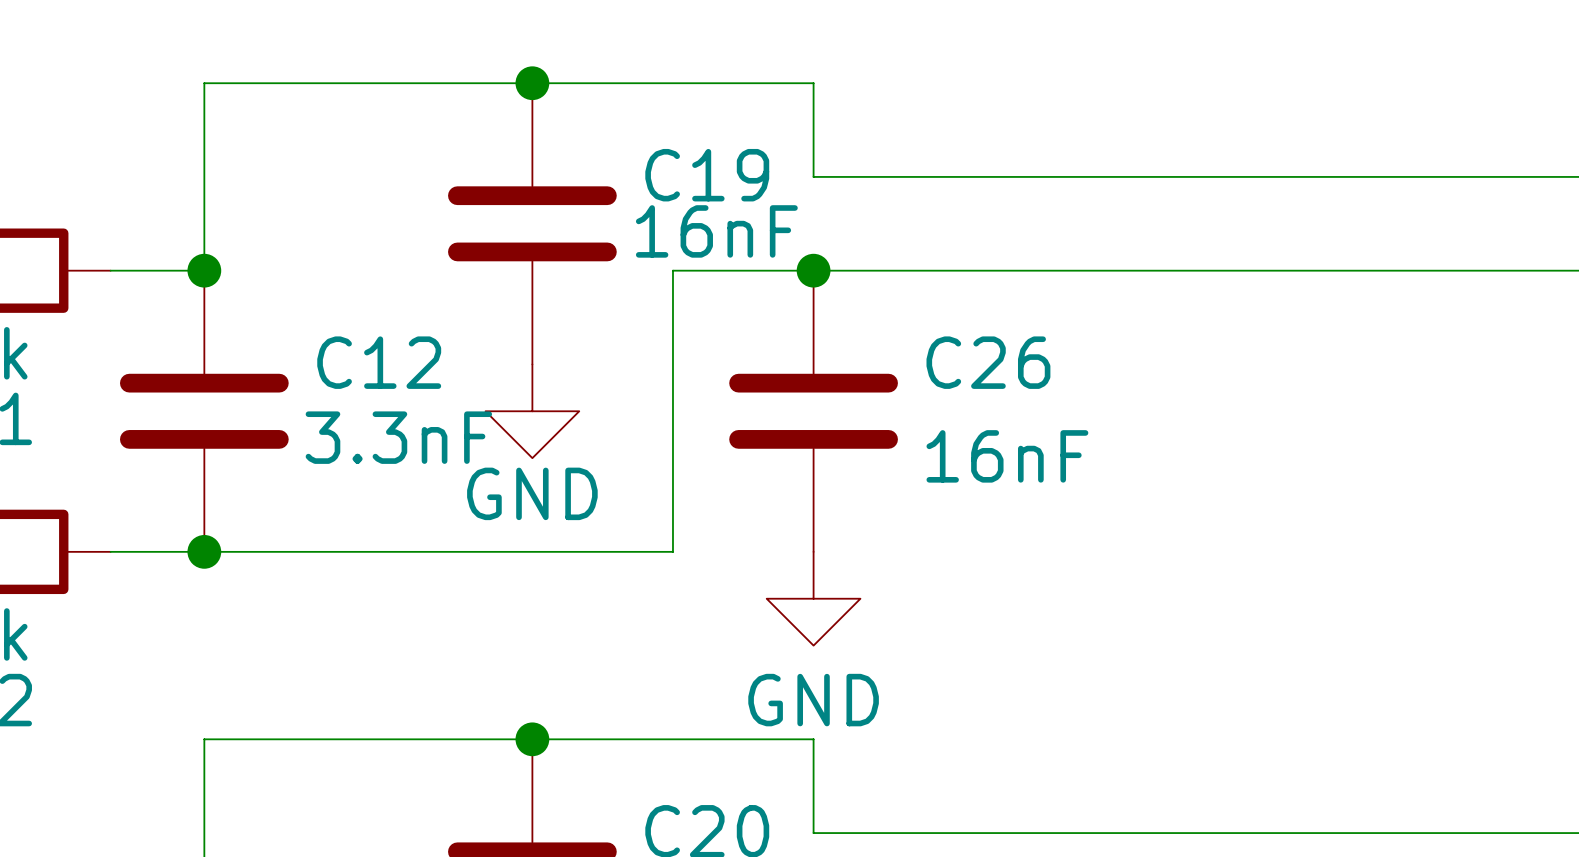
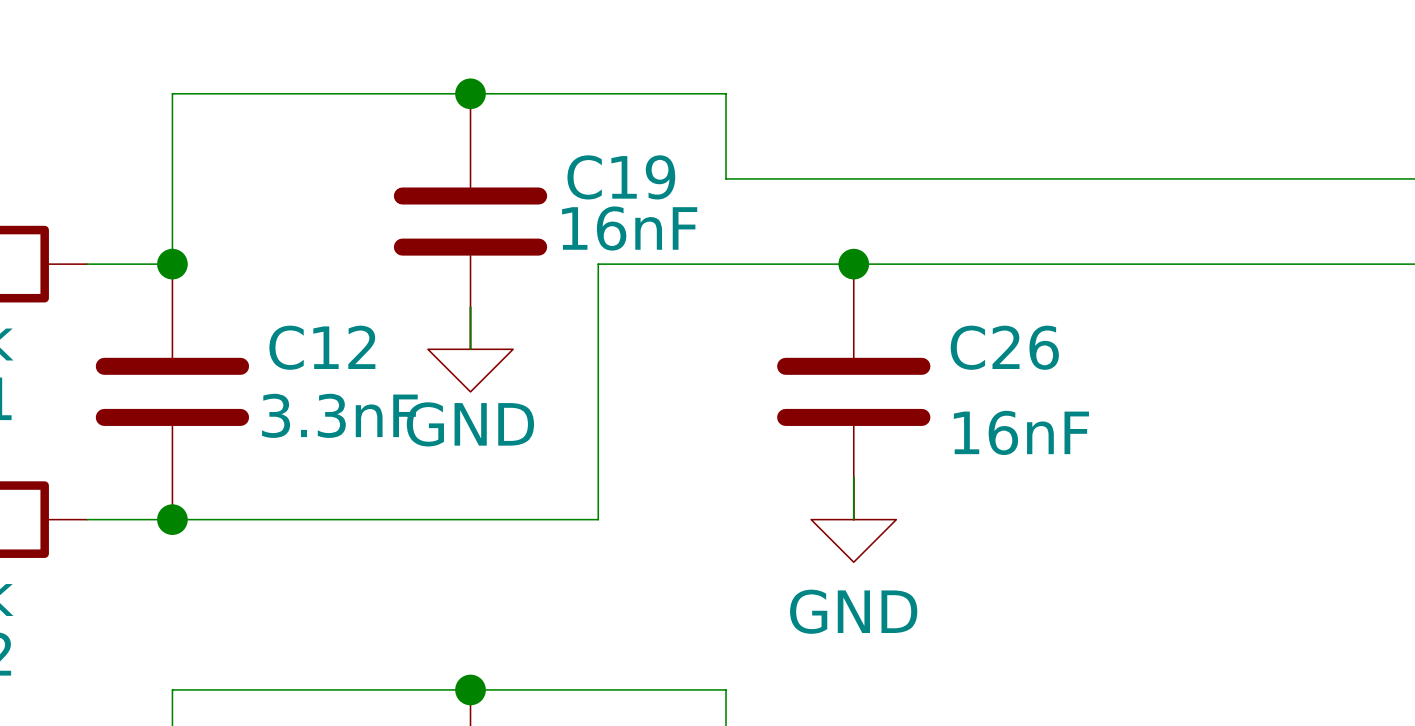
junction position: (813, 270) -> (853, 264)
power symbol position: GND (532, 411) -> GND (470, 349)
C26 position: (813, 411) -> (853, 391)
wire: none -> (853, 477) (853, 519)
power symbol position: GND (813, 598) -> GND (853, 519)

